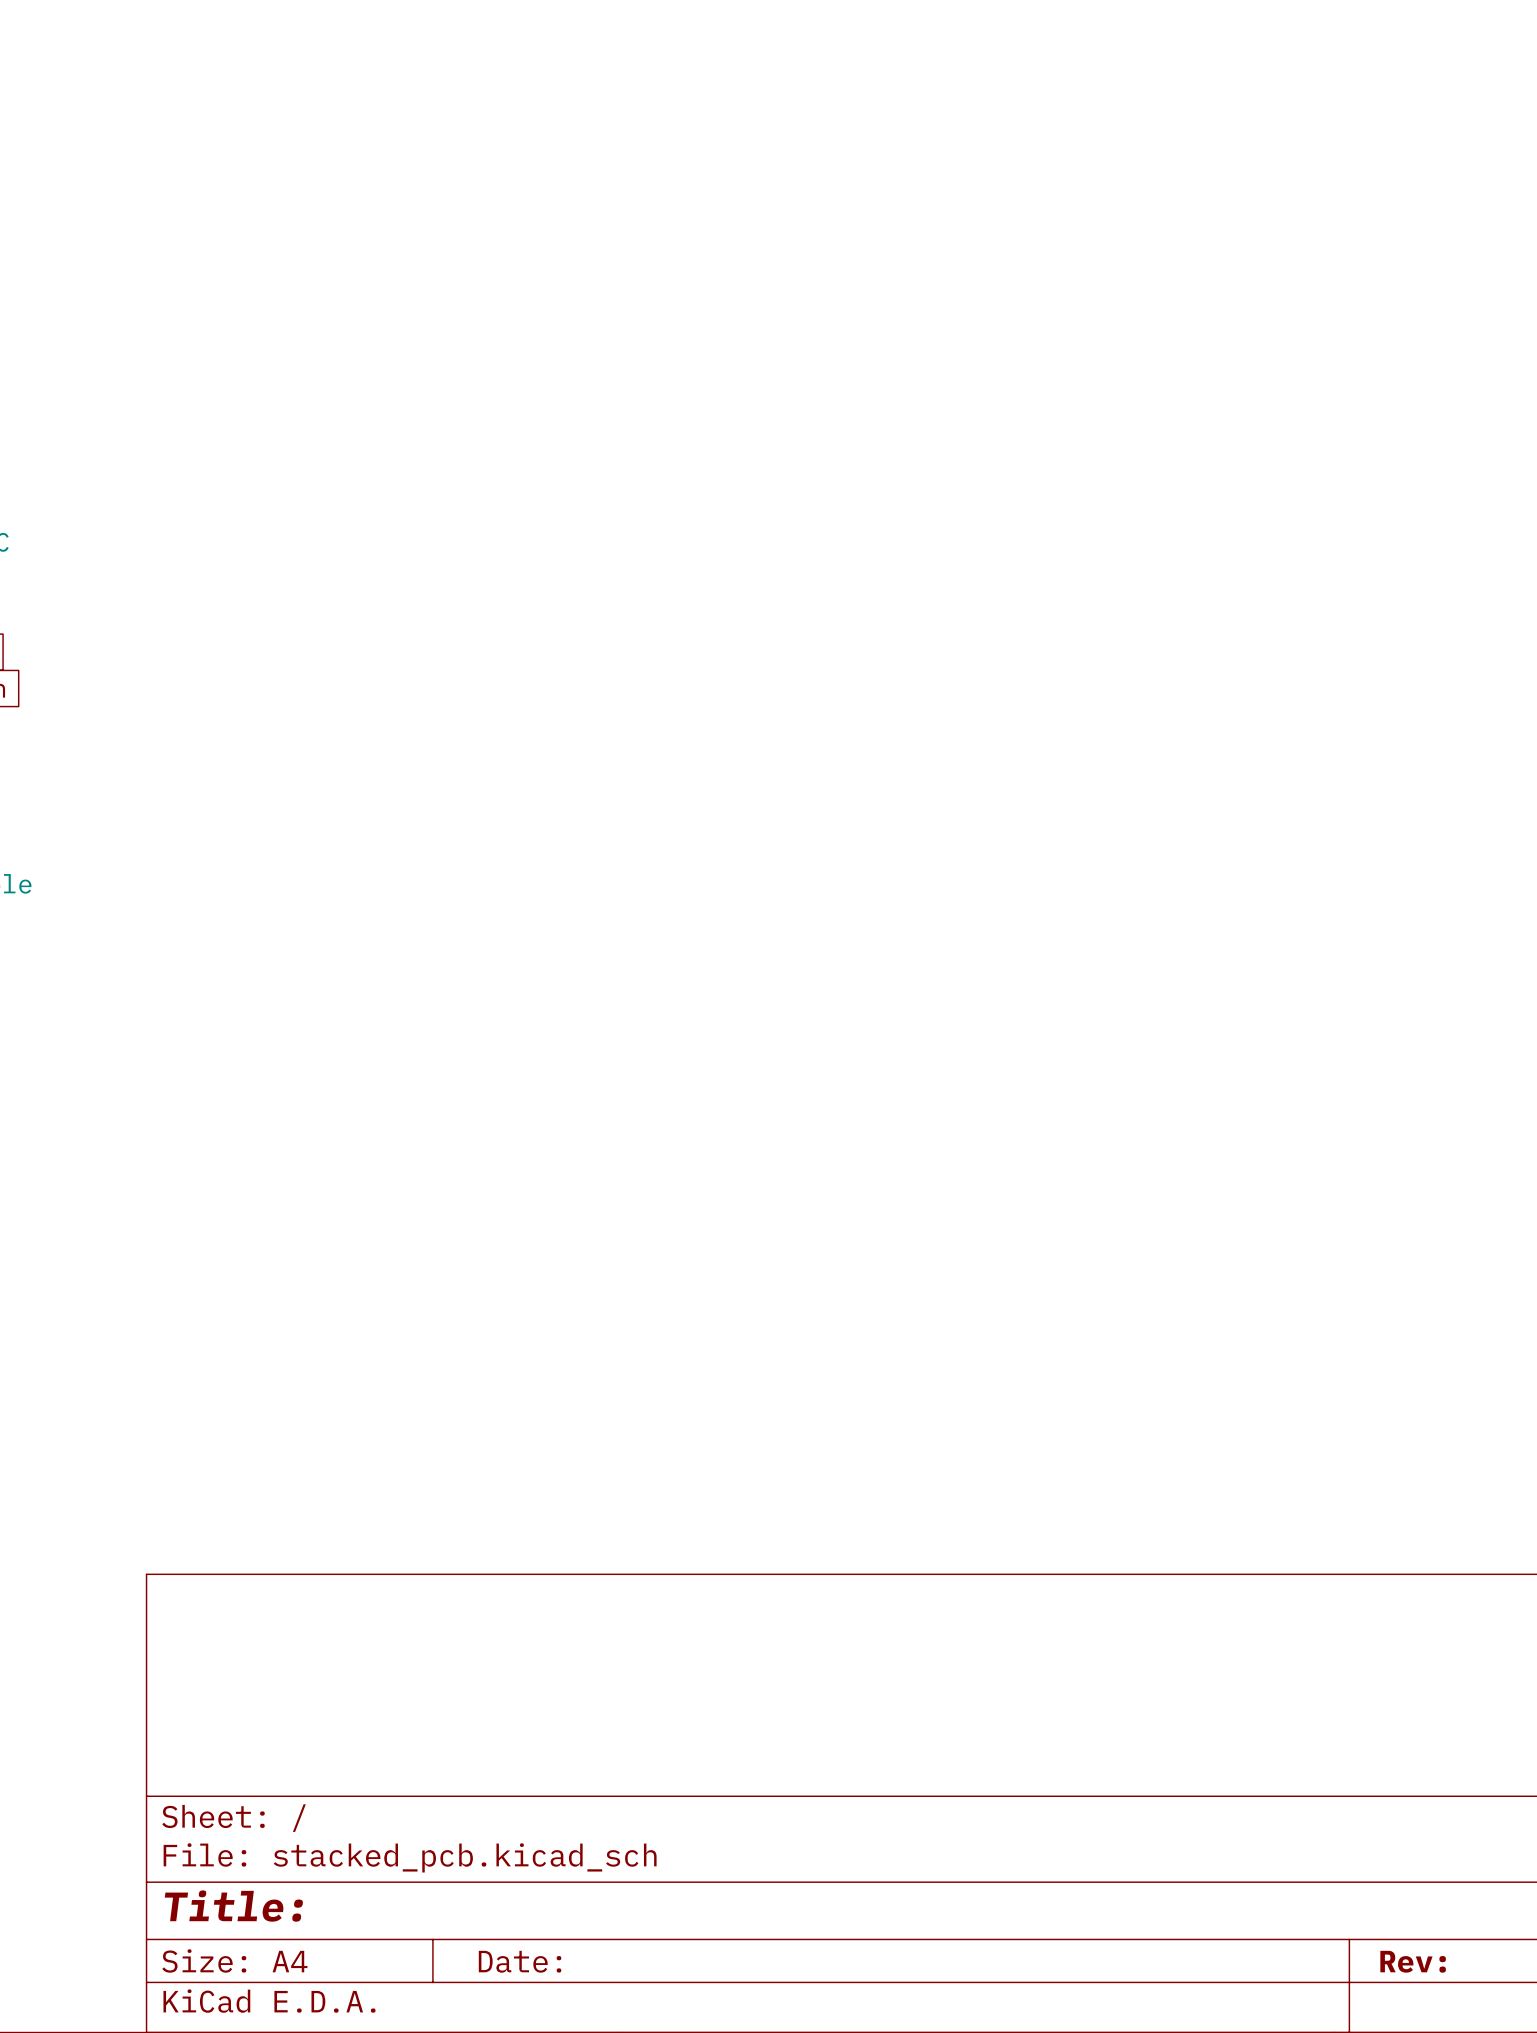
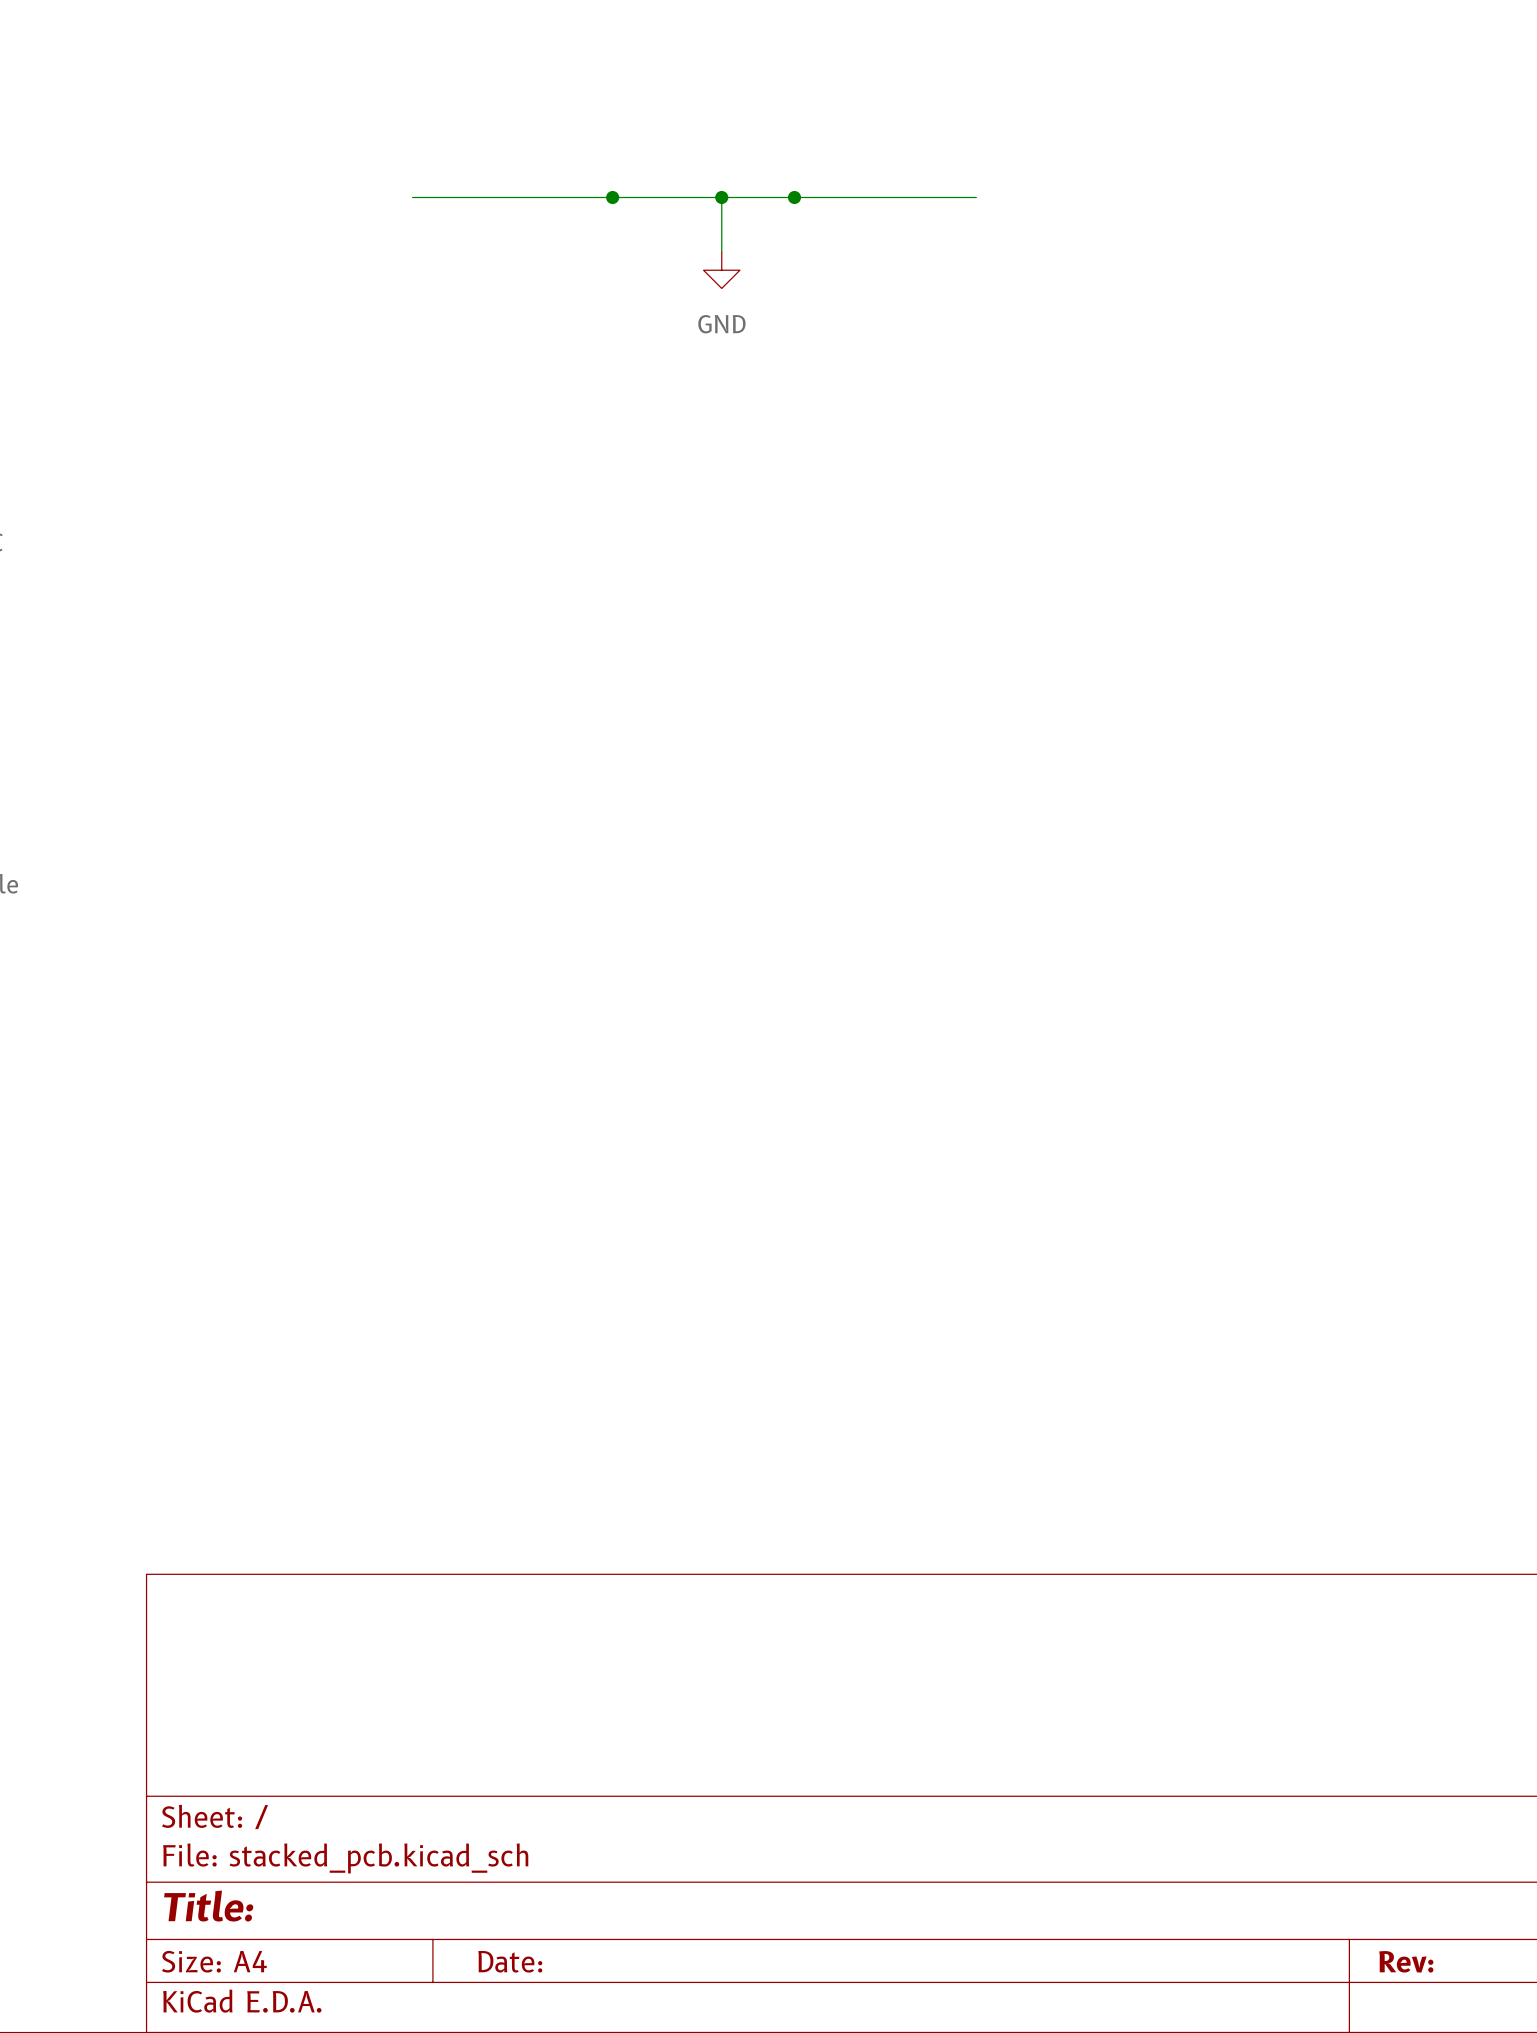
wire: none -> (412, 197) (976, 197)
junction: none -> (612, 197)
wire: none -> (721, 197) (721, 252)
junction: none -> (721, 197)
junction: none -> (794, 197)
power symbol: none -> GND (721, 270)

